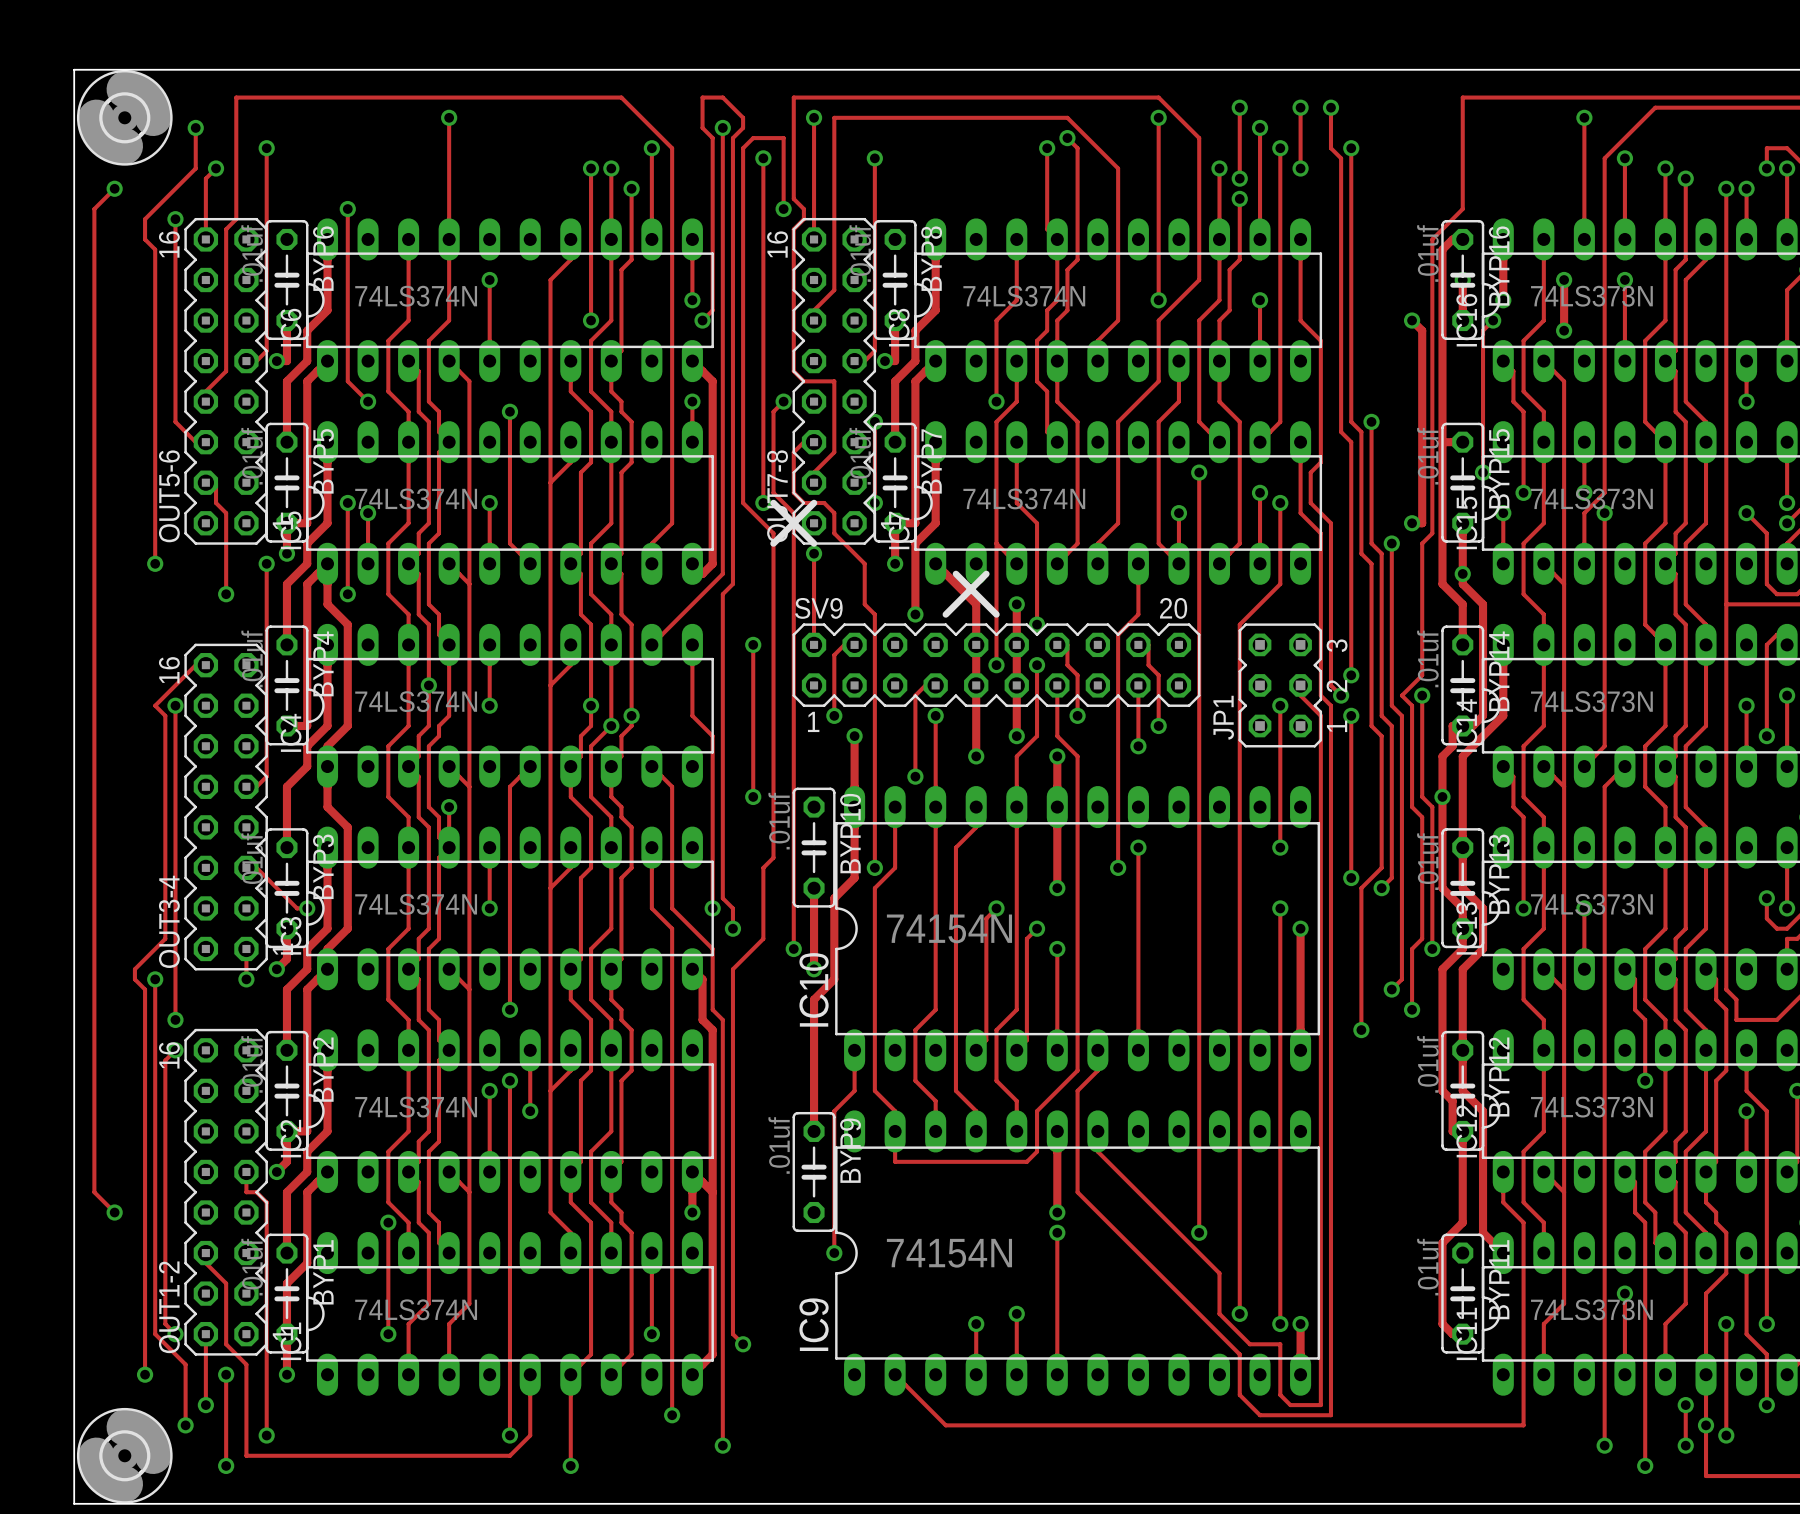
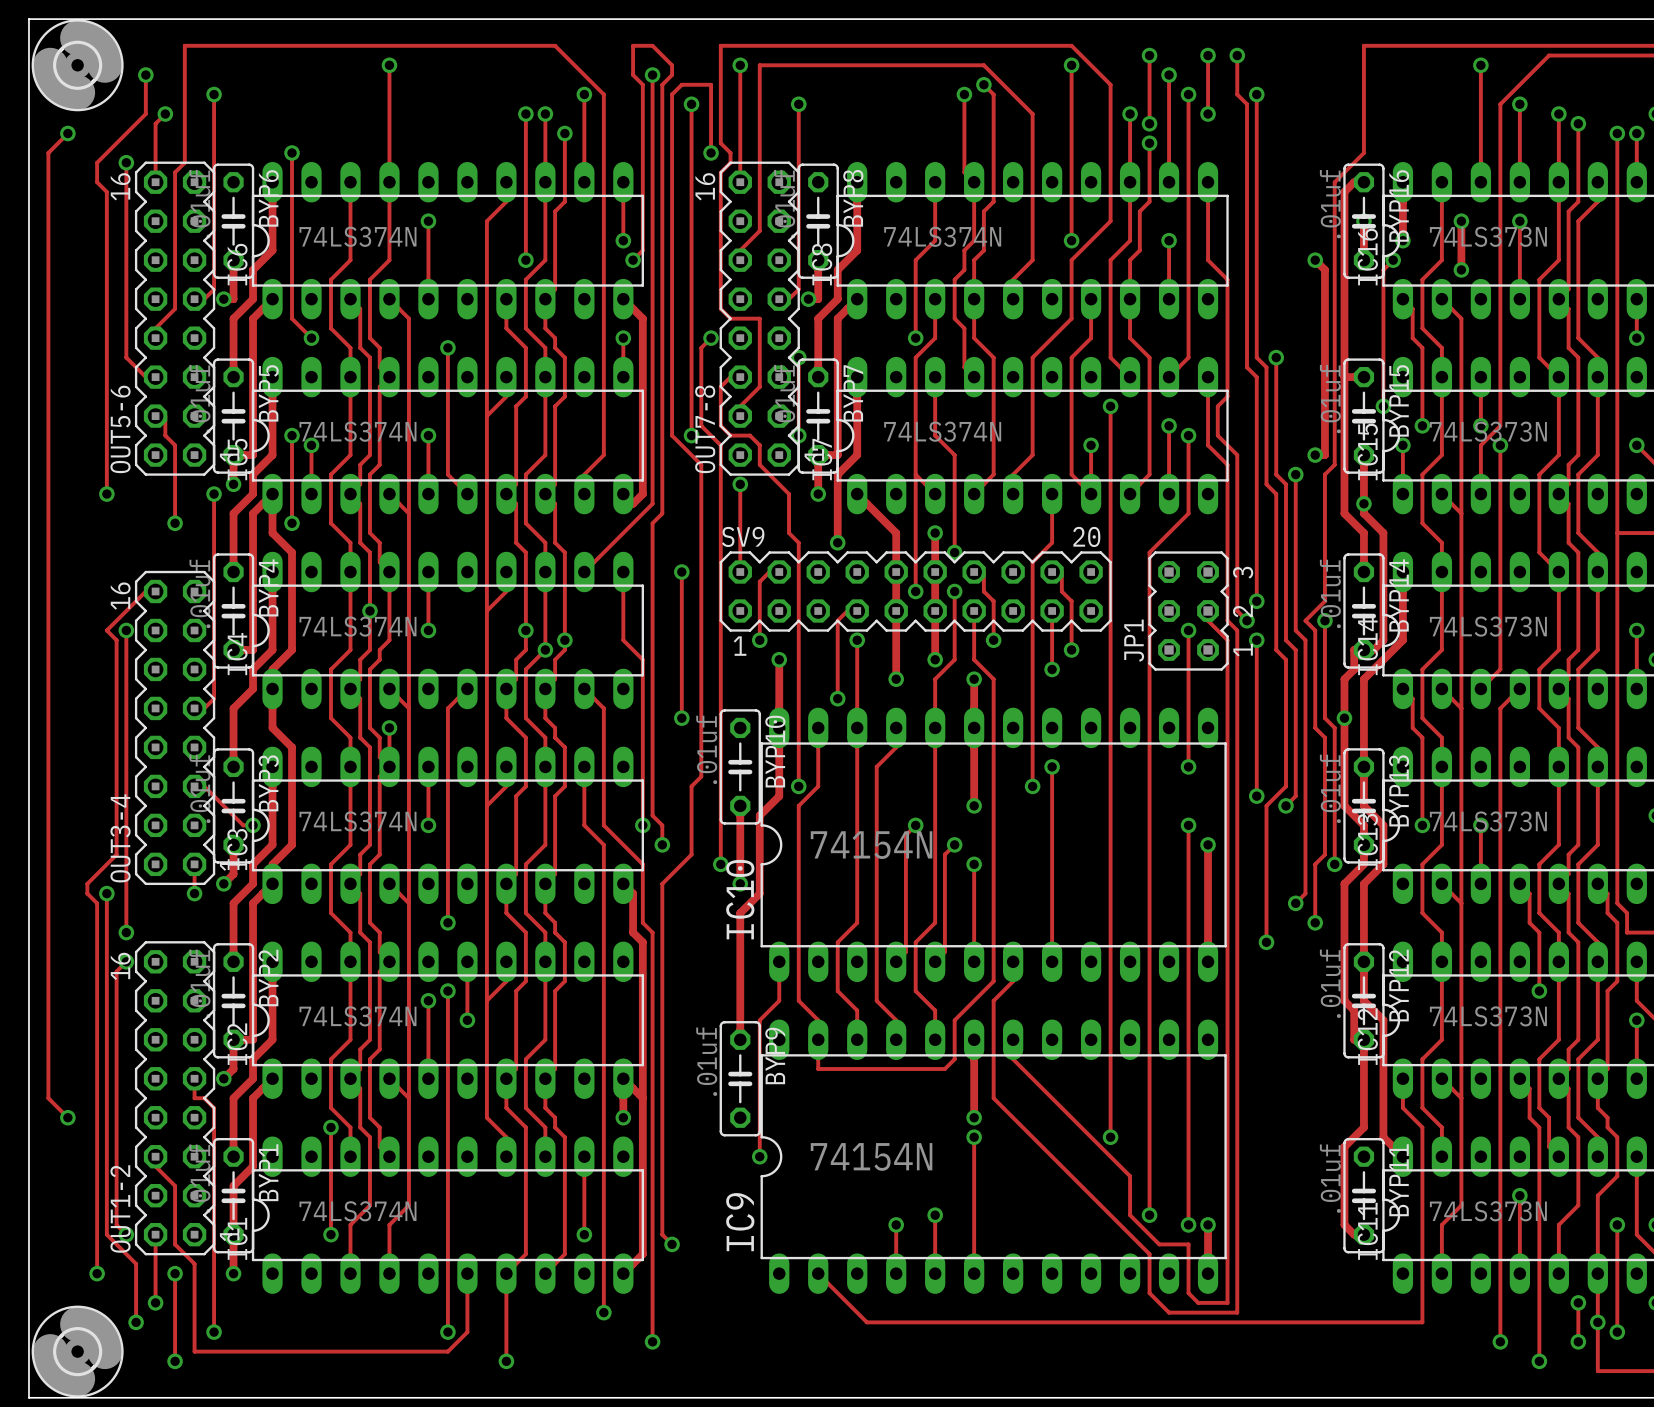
line: (773, 502) (814, 543) -> none
line: (814, 502) (773, 543) -> none
line: (955, 573) (996, 614) -> none
line: (986, 573) (945, 614) -> none

